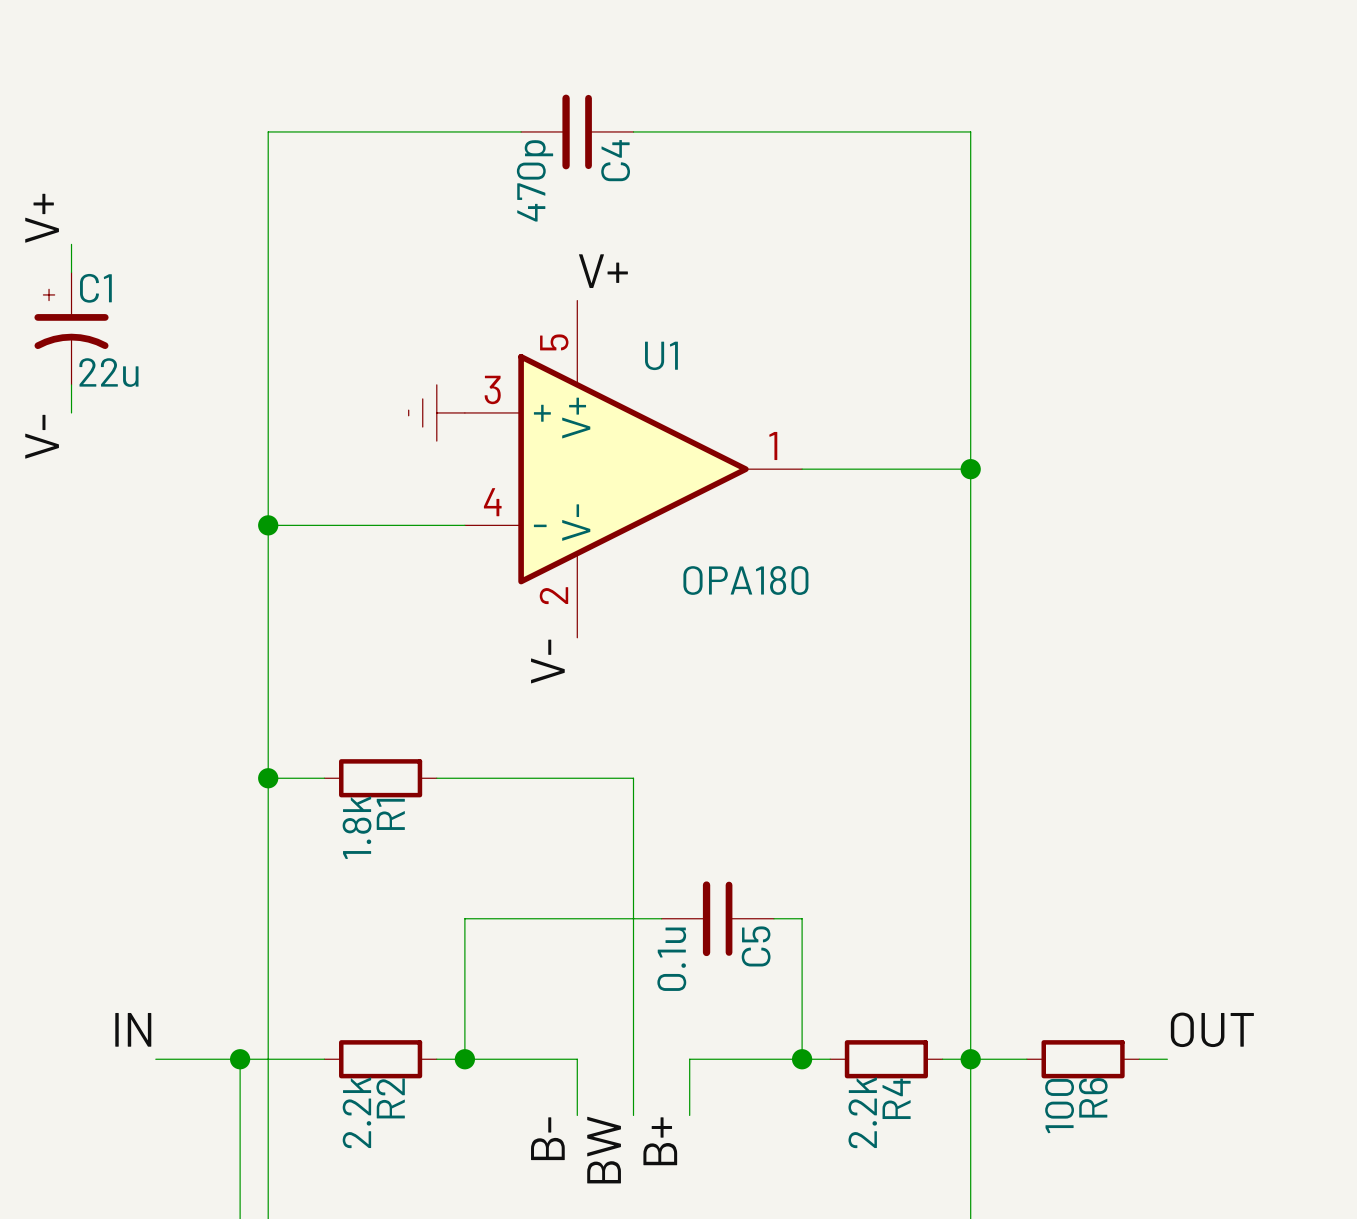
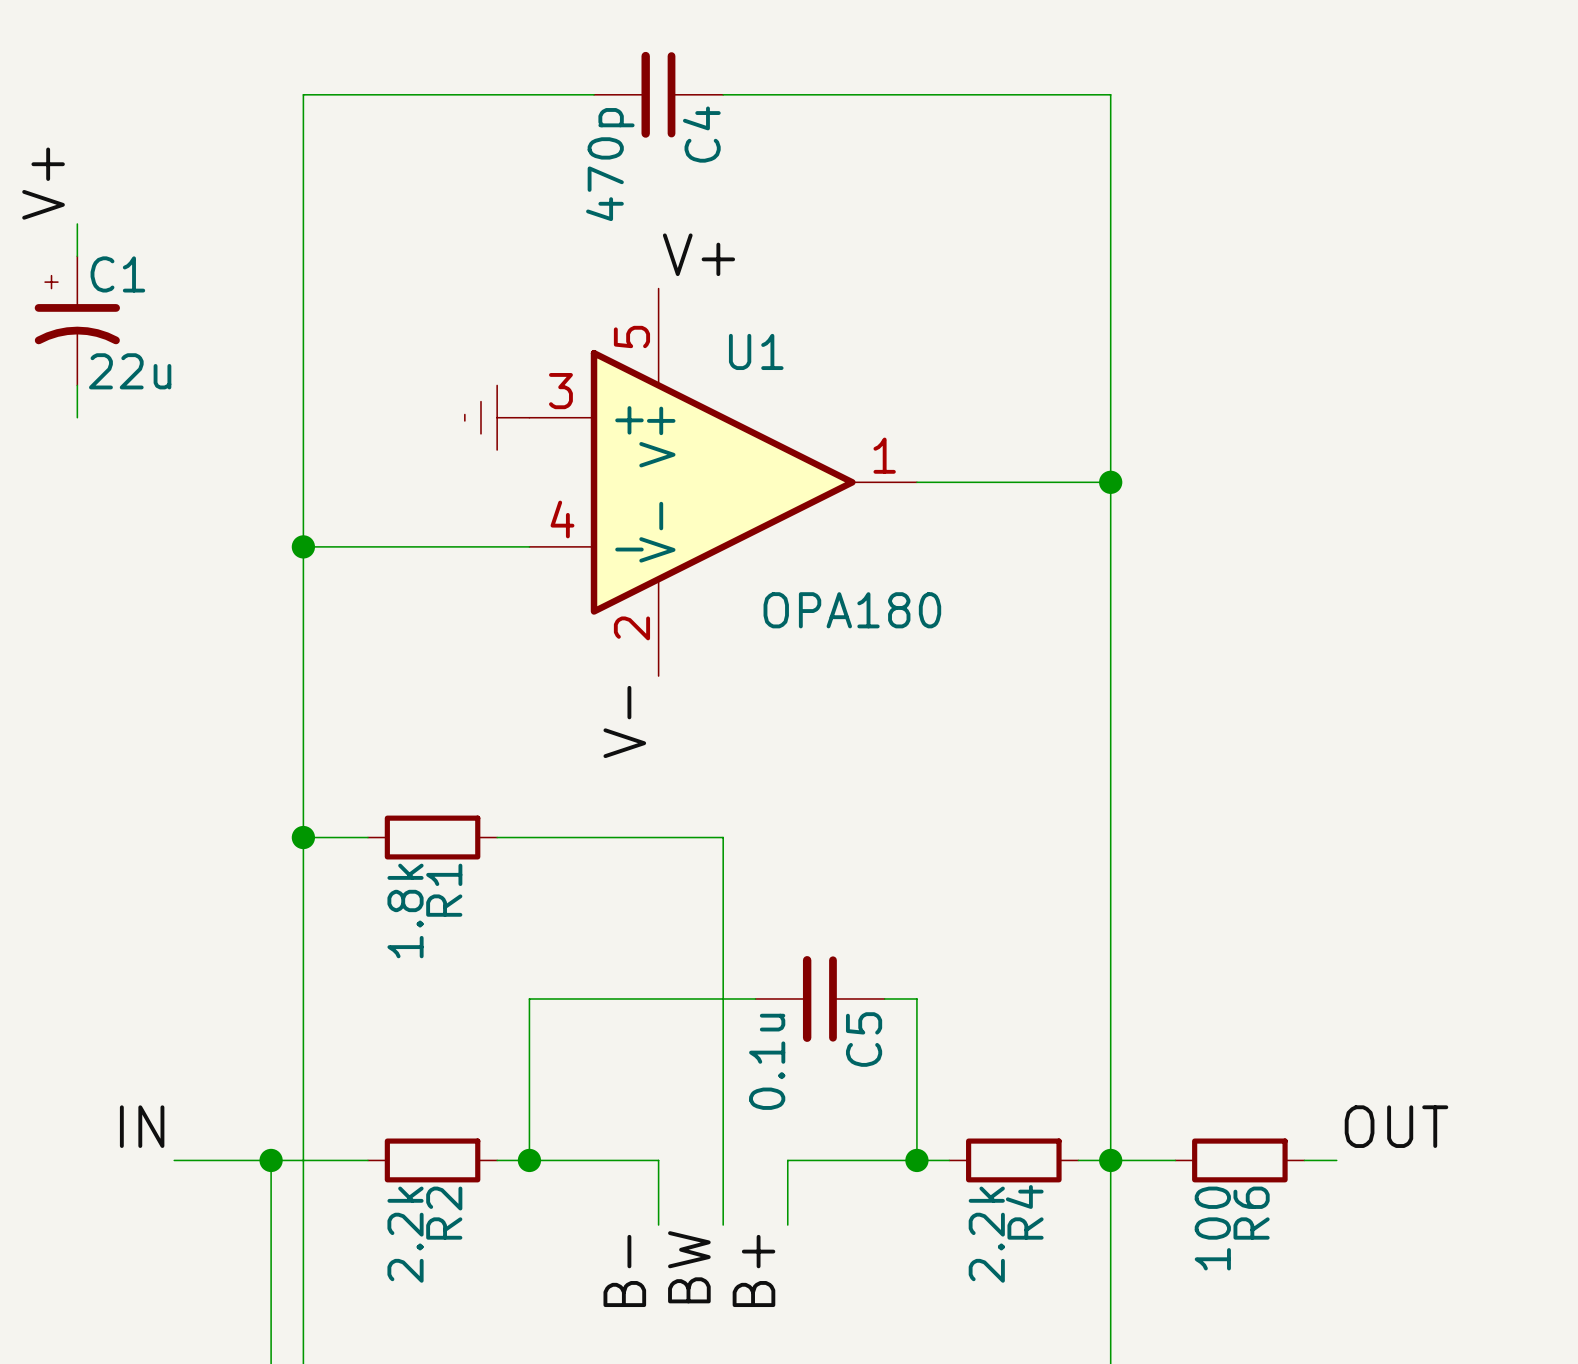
label: V- (42, 436) -> none

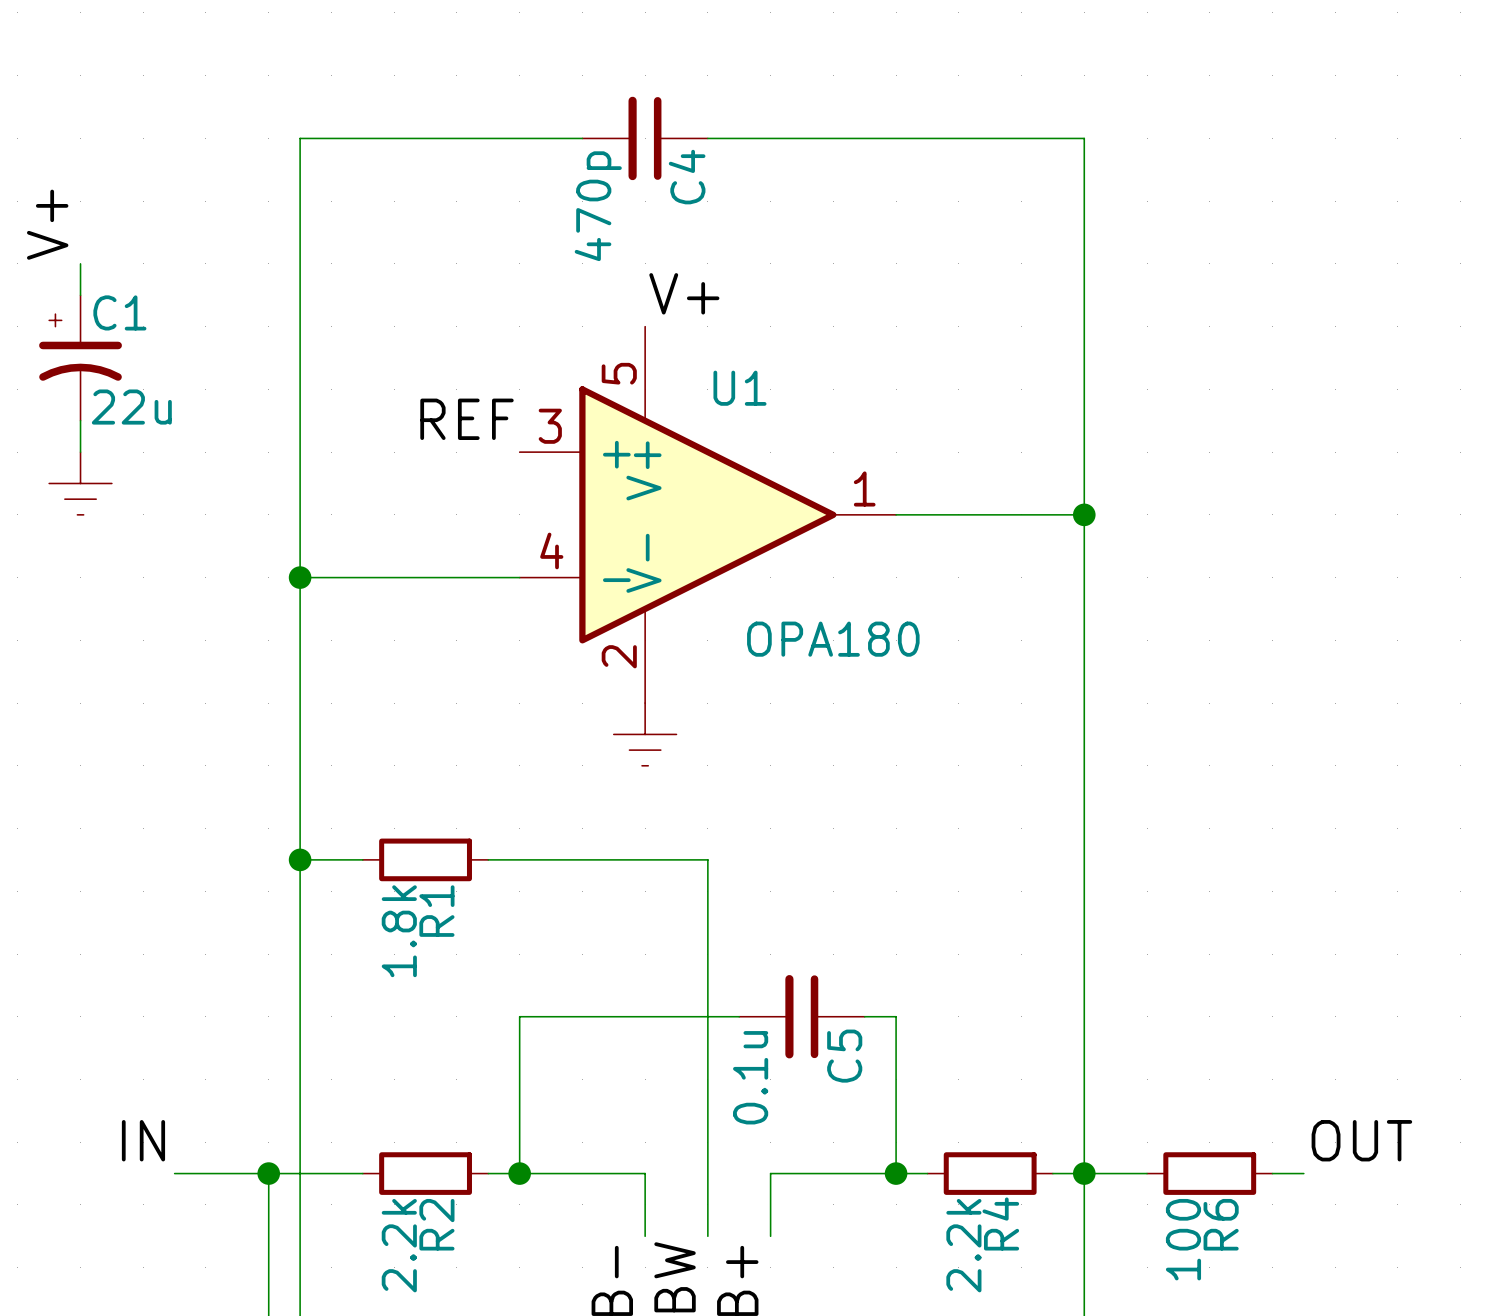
label: none -> REF (467, 419)
power symbol: (497, 417) -> none
power symbol: none -> (80, 483)
power symbol: none -> (645, 734)
label: V- (624, 721) -> none

